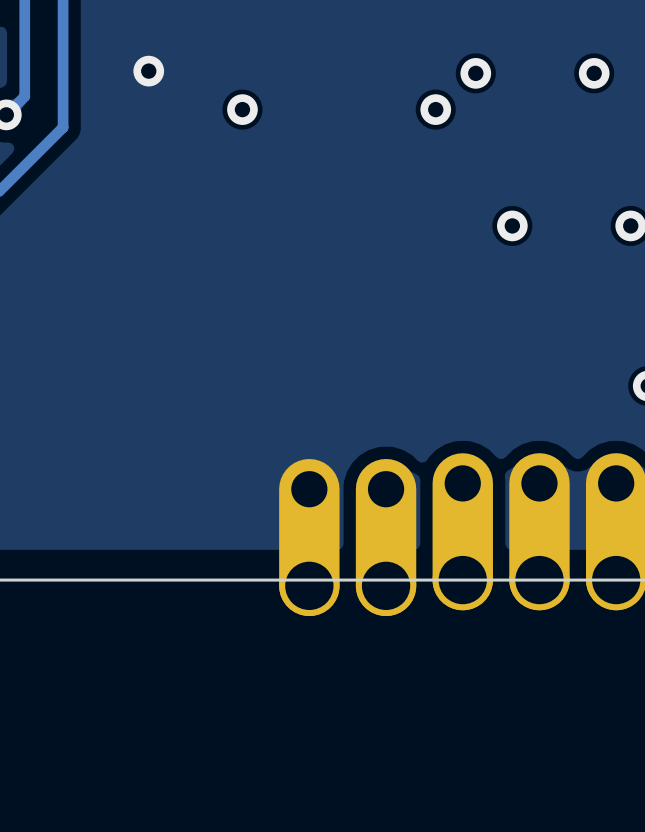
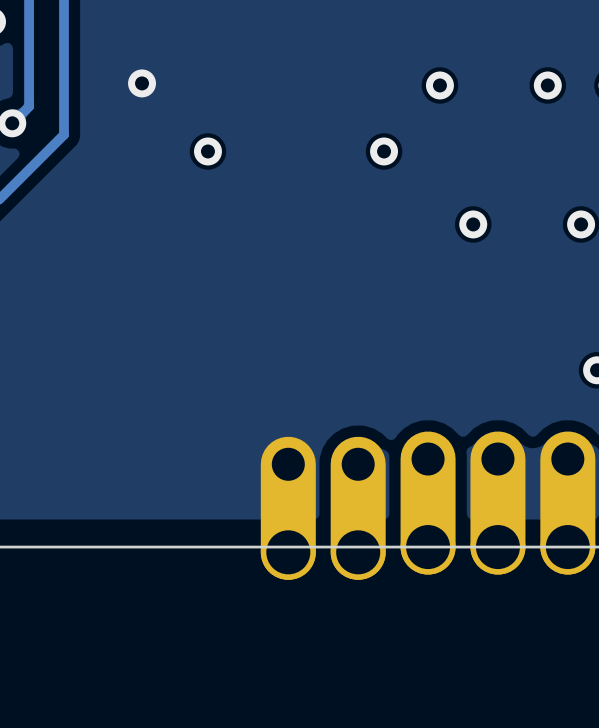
via position: (242, 109) -> (207, 151)
via position: (435, 109) -> (384, 151)

